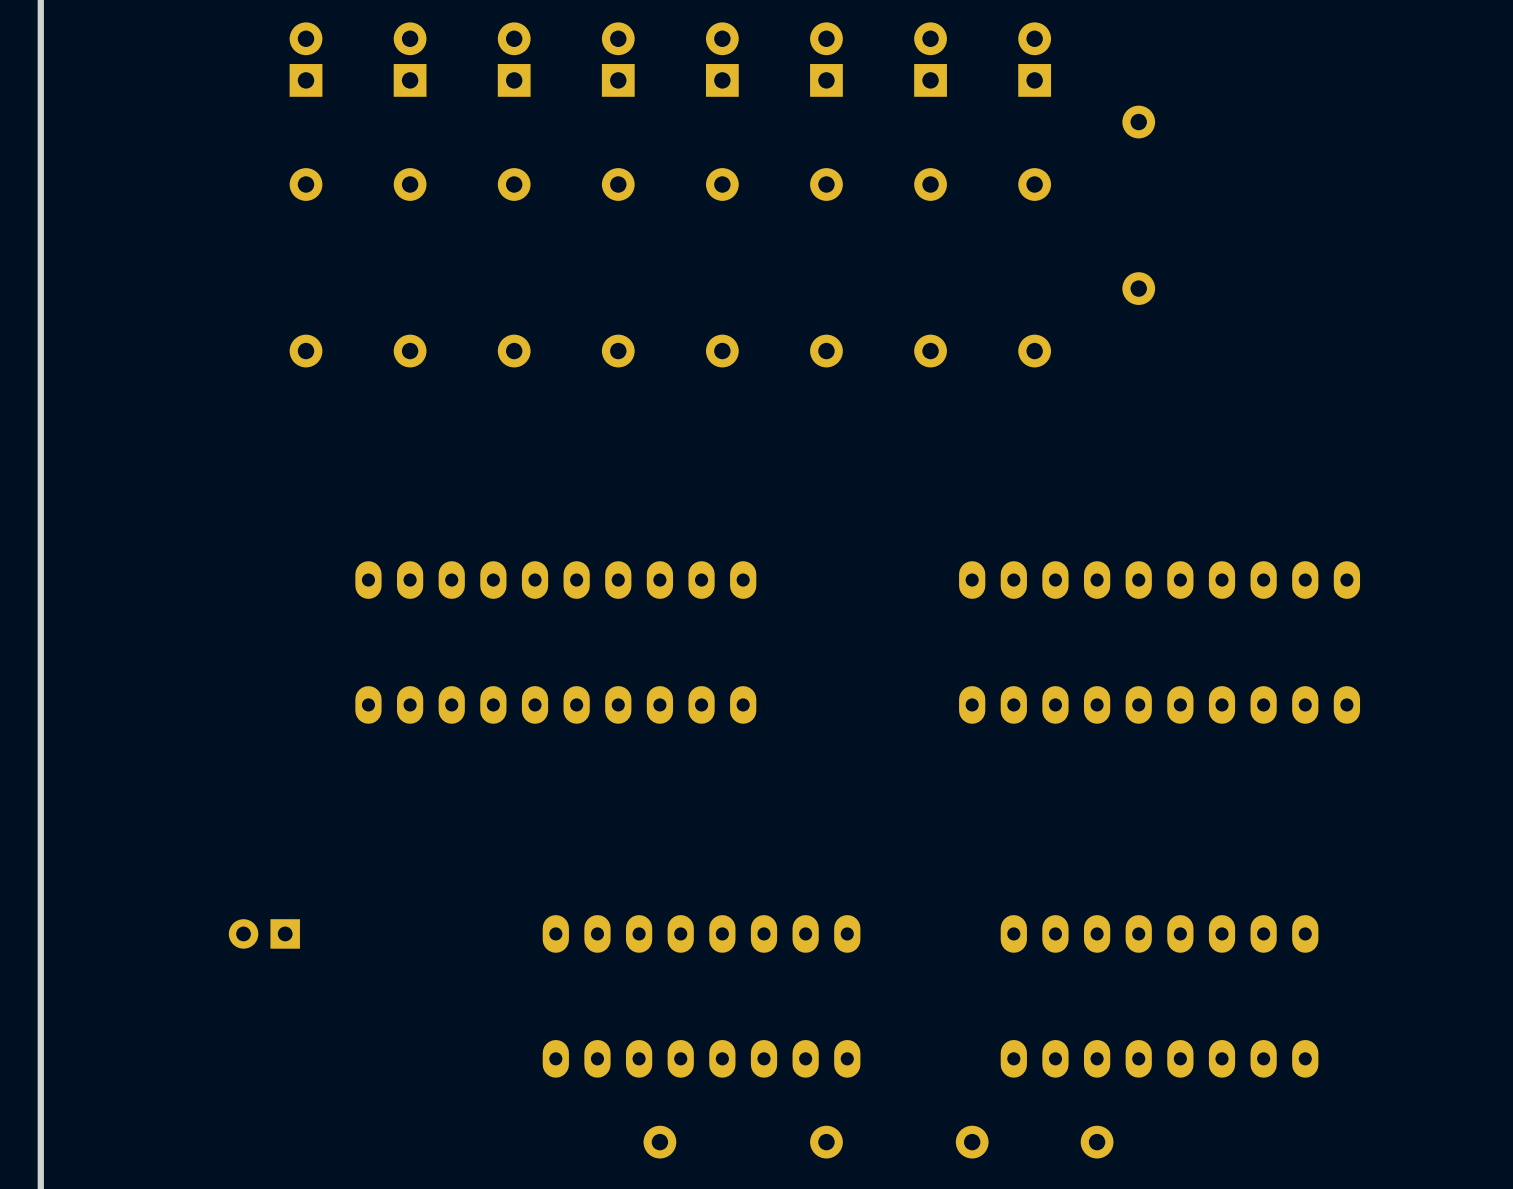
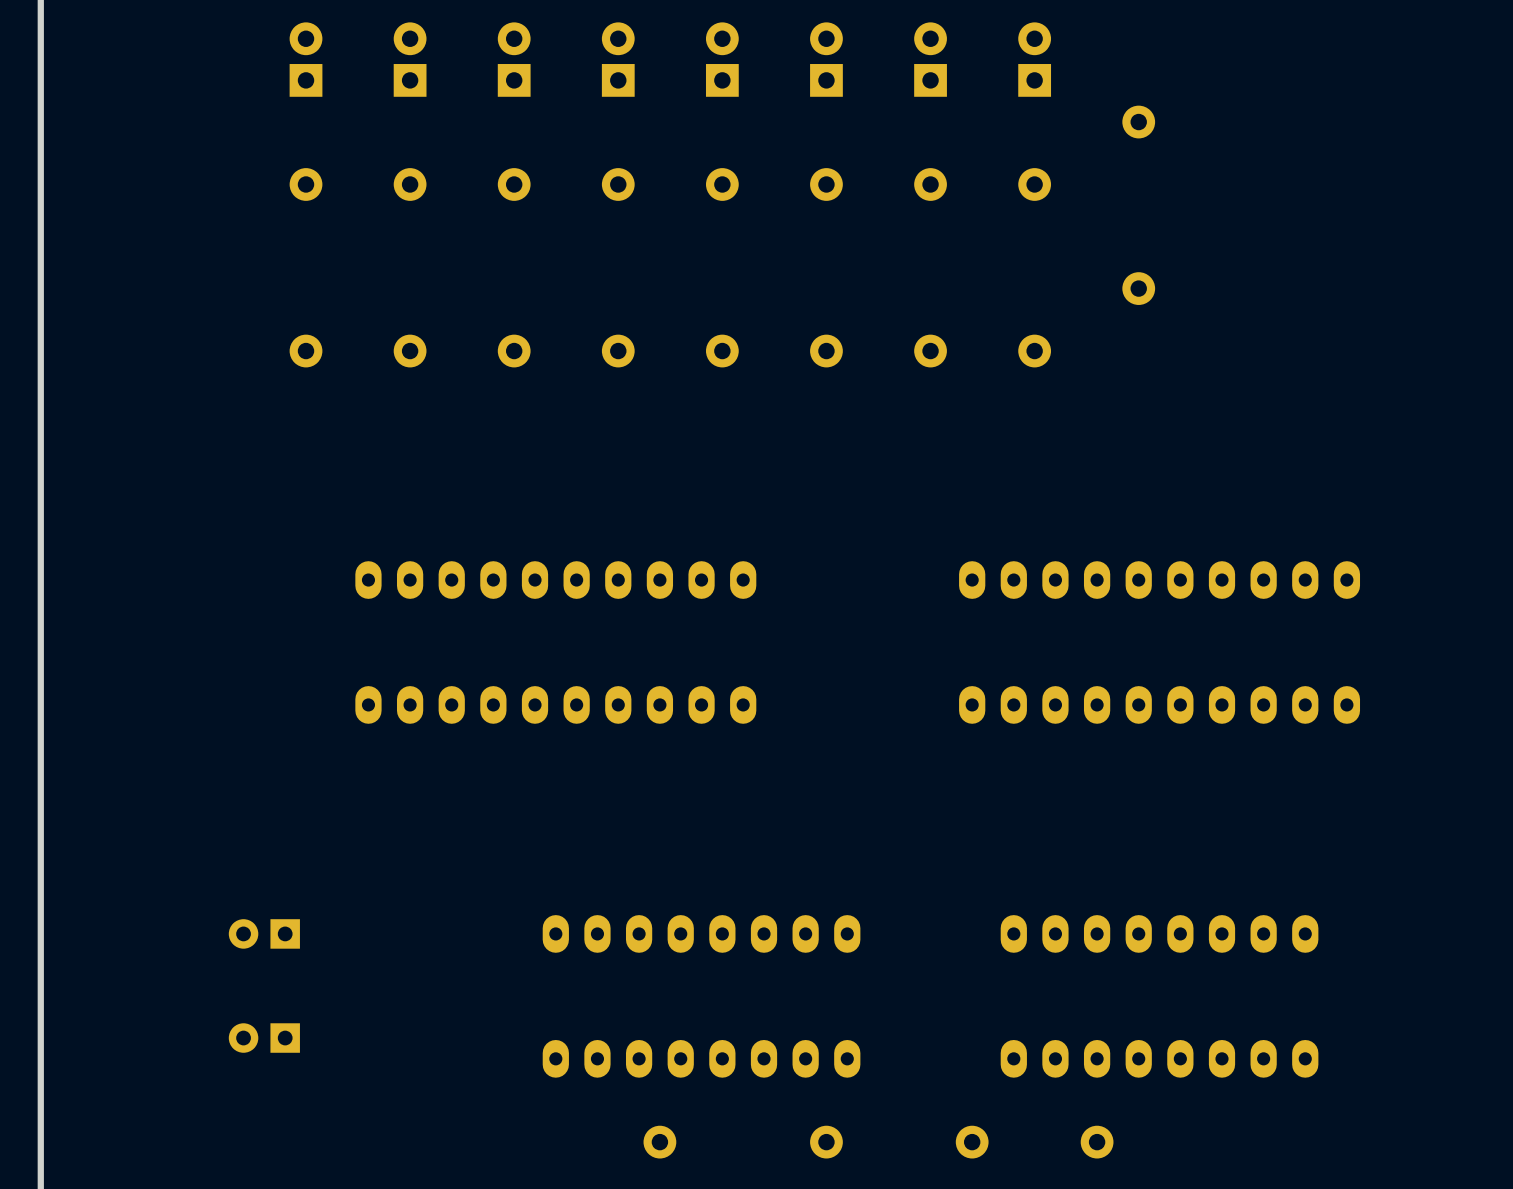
part: none -> (264, 1038)

